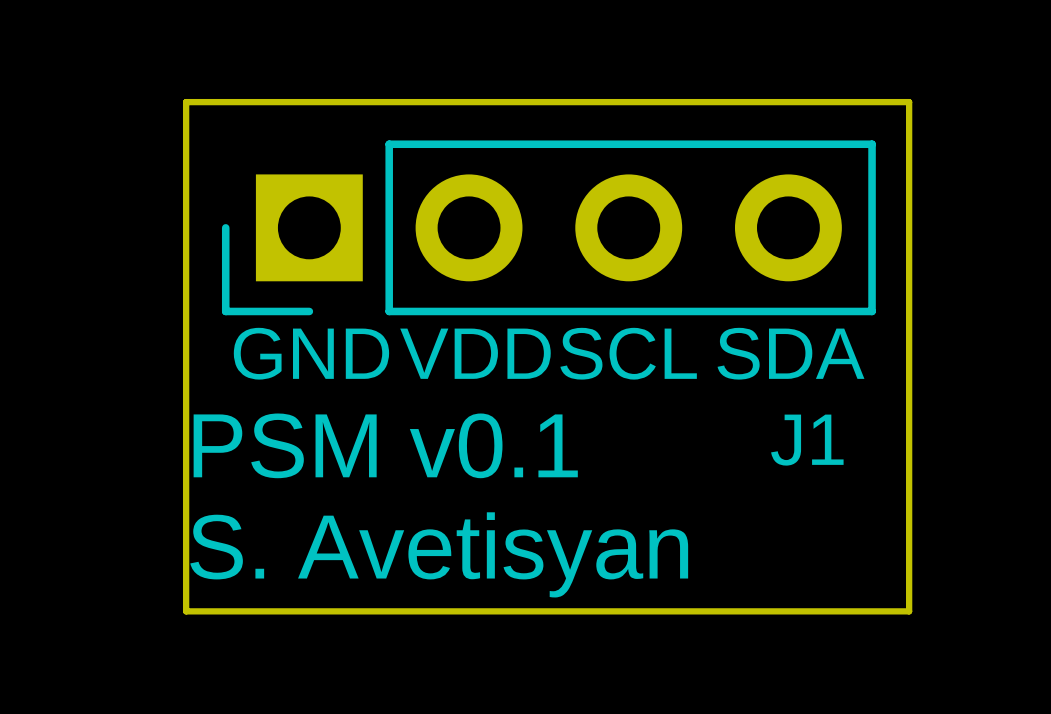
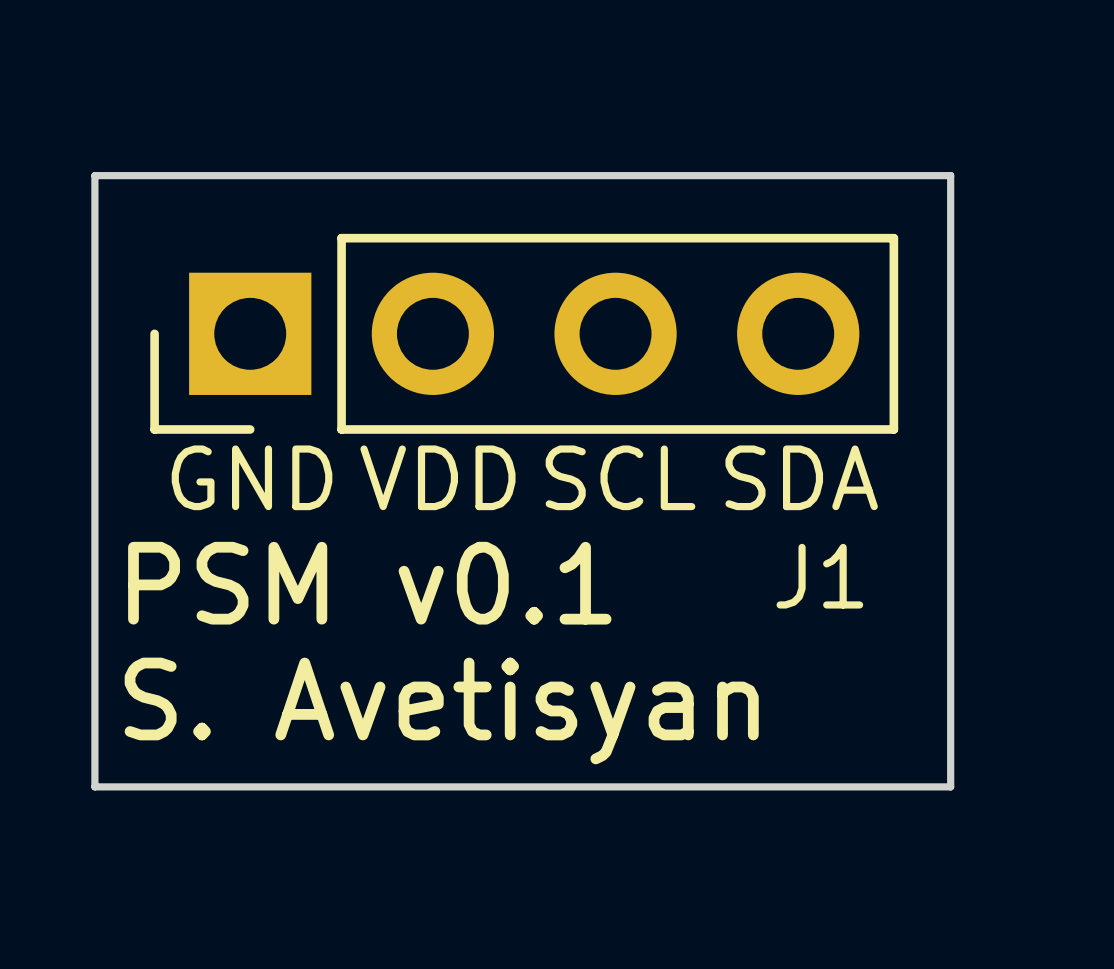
board edge: (909, 102) (186, 102) (186, 611) (909, 611) (909, 102) -> (950, 175) (950, 786) (94, 786) (94, 175) (950, 175)

